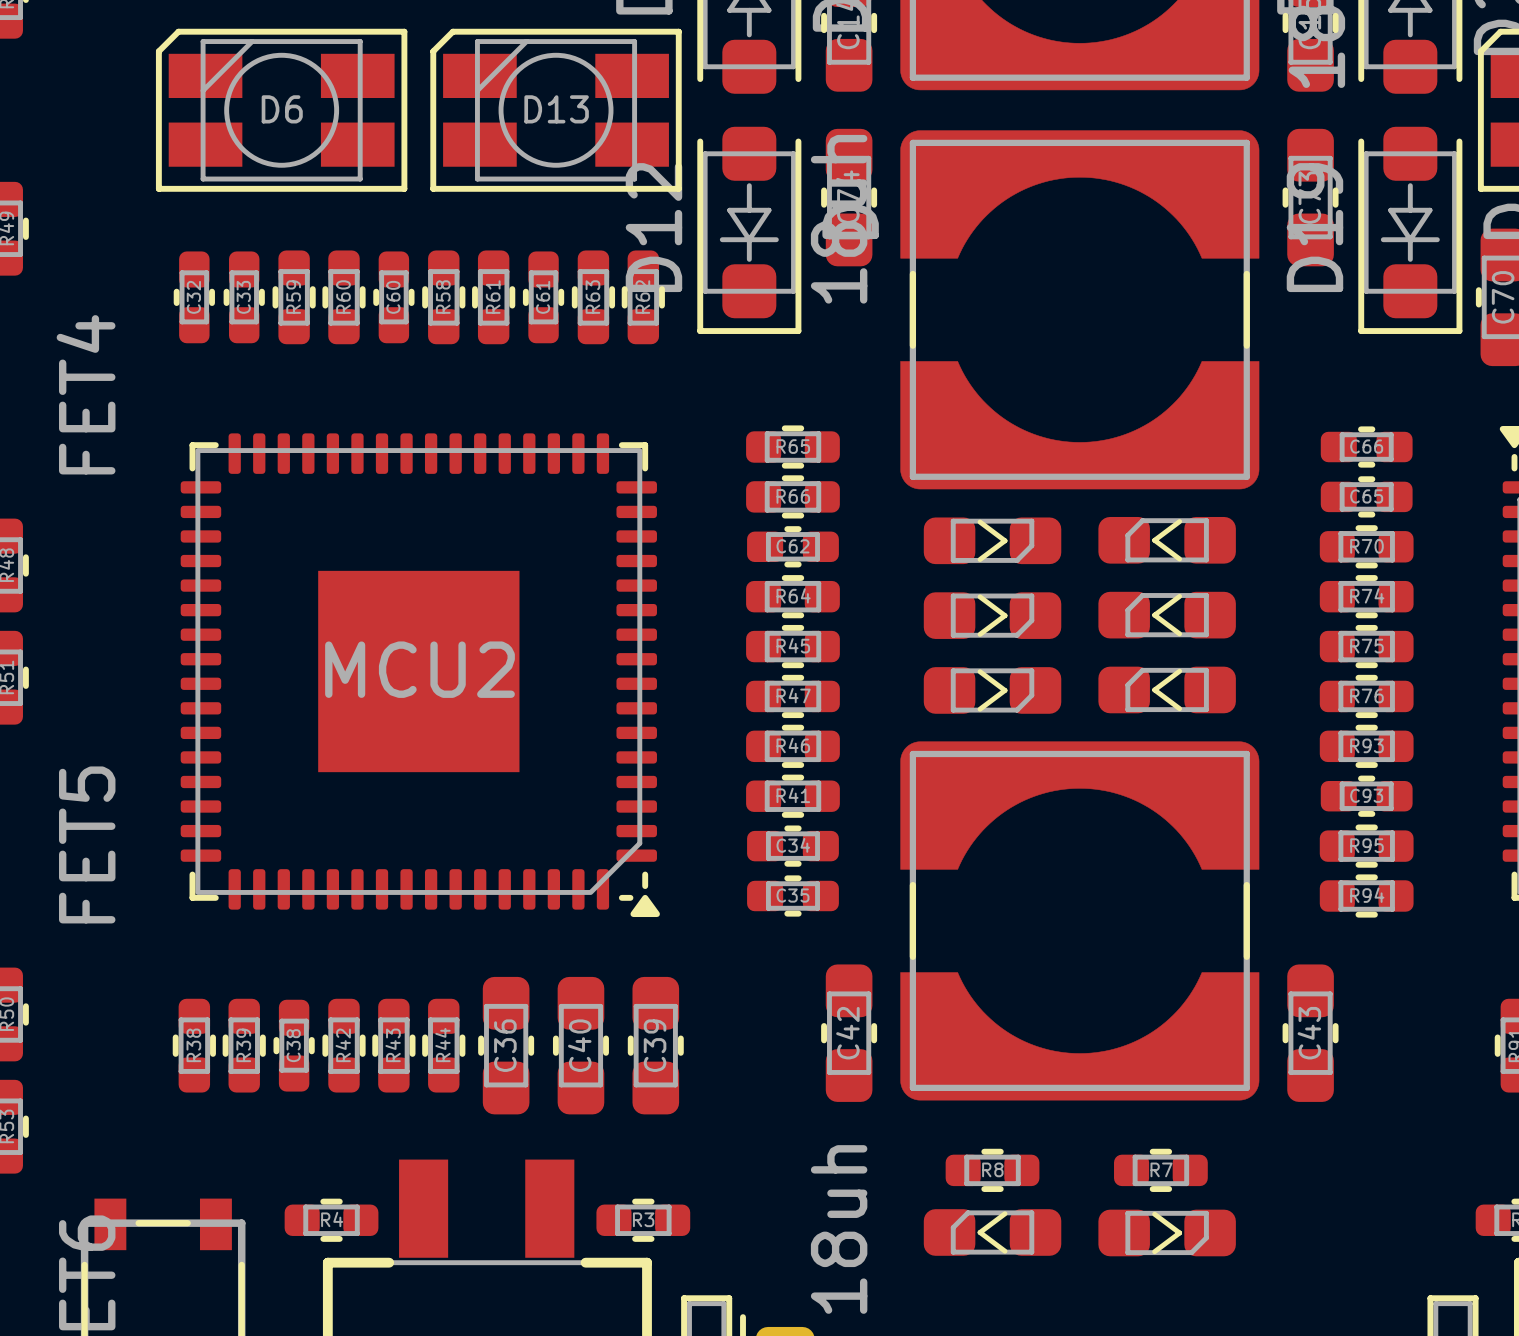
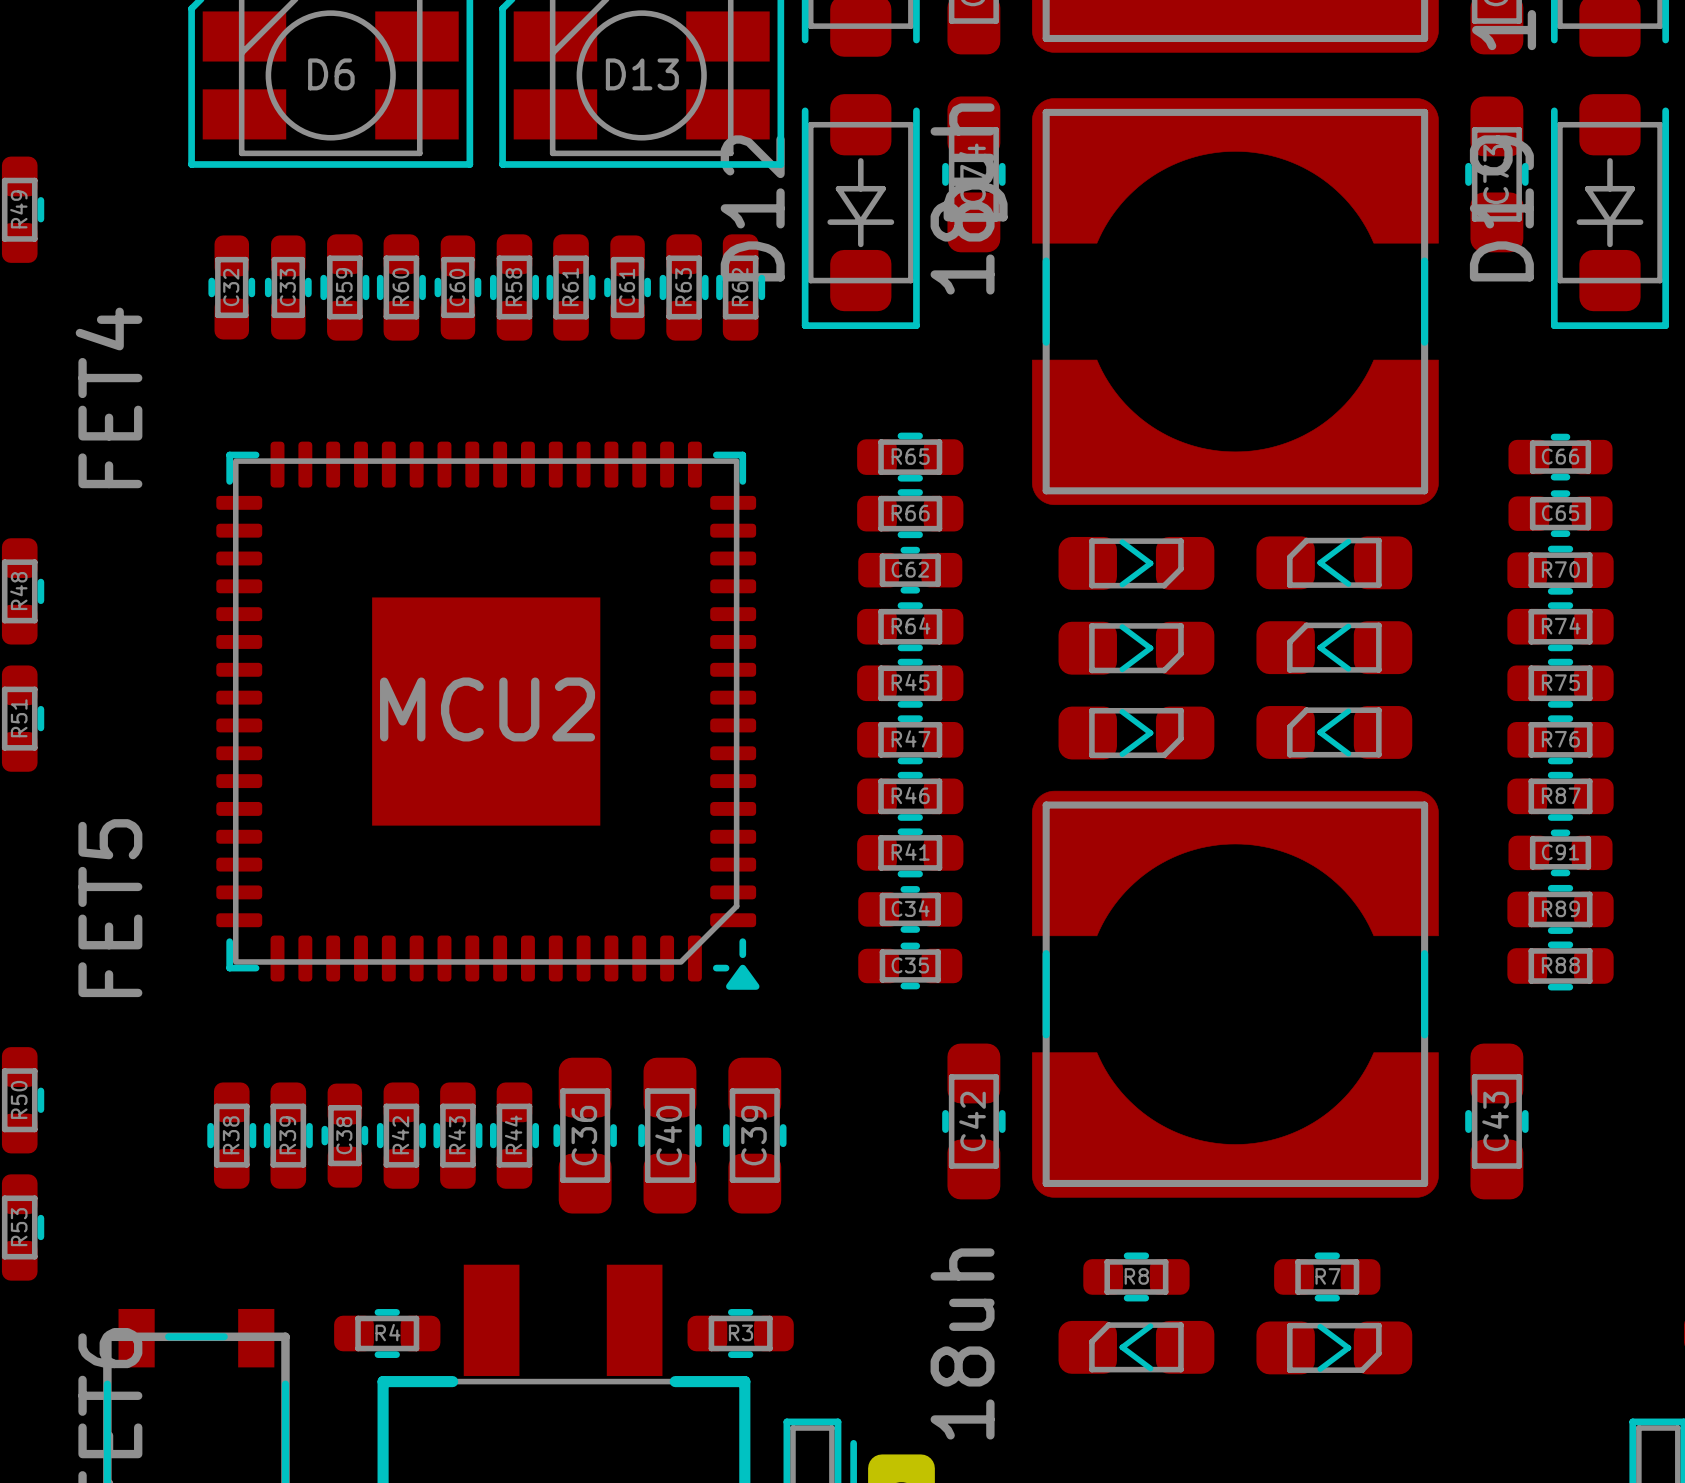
R93 name: R93 (1366, 745) -> R87 (1561, 795)
C93 name: C93 (1366, 795) -> C91 (1560, 852)
R95 name: R95 (1366, 845) -> R89 (1560, 908)
R94 name: R94 (1367, 895) -> R88 (1560, 965)

